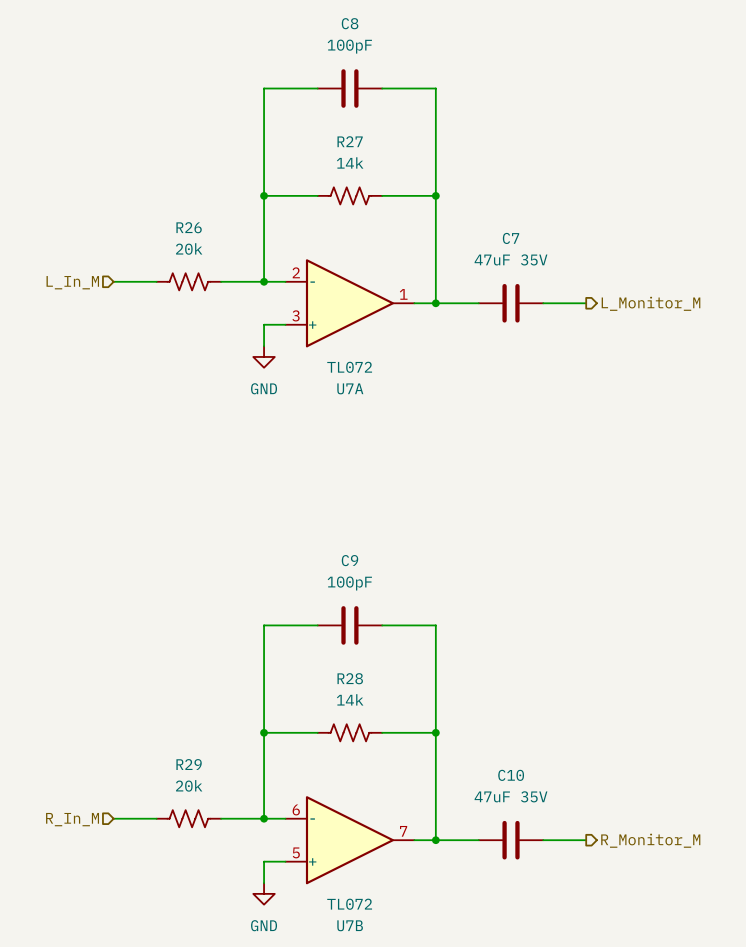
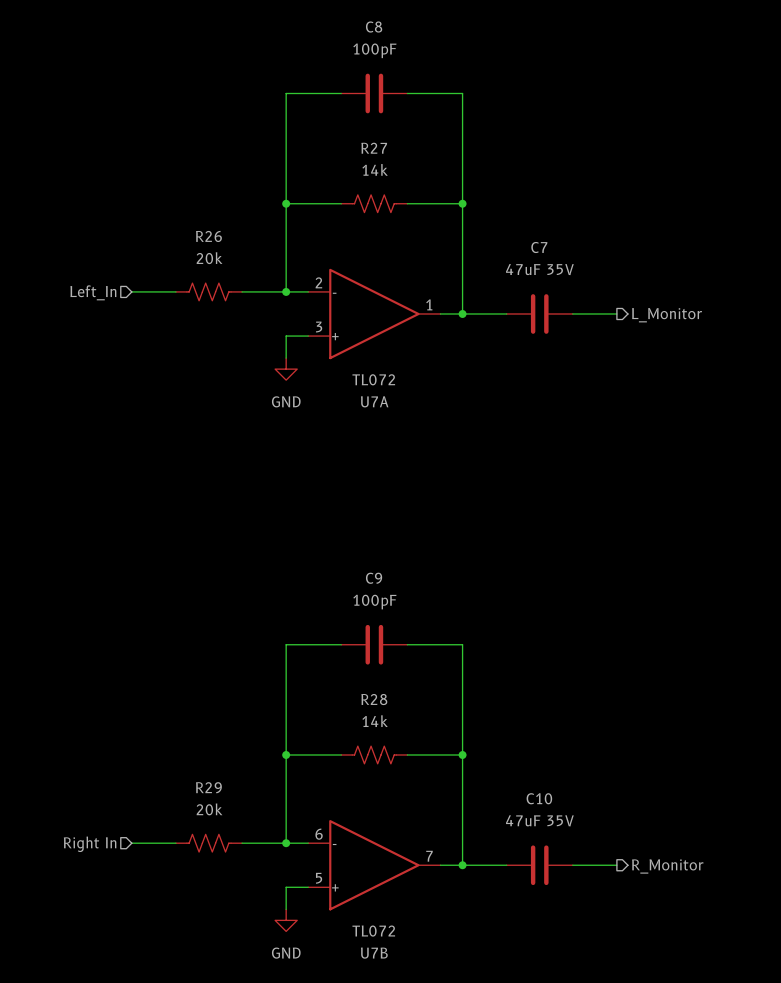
hierarchical label: L_In_M (72, 282) -> Left_In (93, 292)
hierarchical label: L_Monitor_M (650, 303) -> L_Monitor (667, 315)
hierarchical label: R_In_M (72, 819) -> Right In (90, 844)
hierarchical label: R_Monitor_M (650, 840) -> R_Monitor (667, 866)

